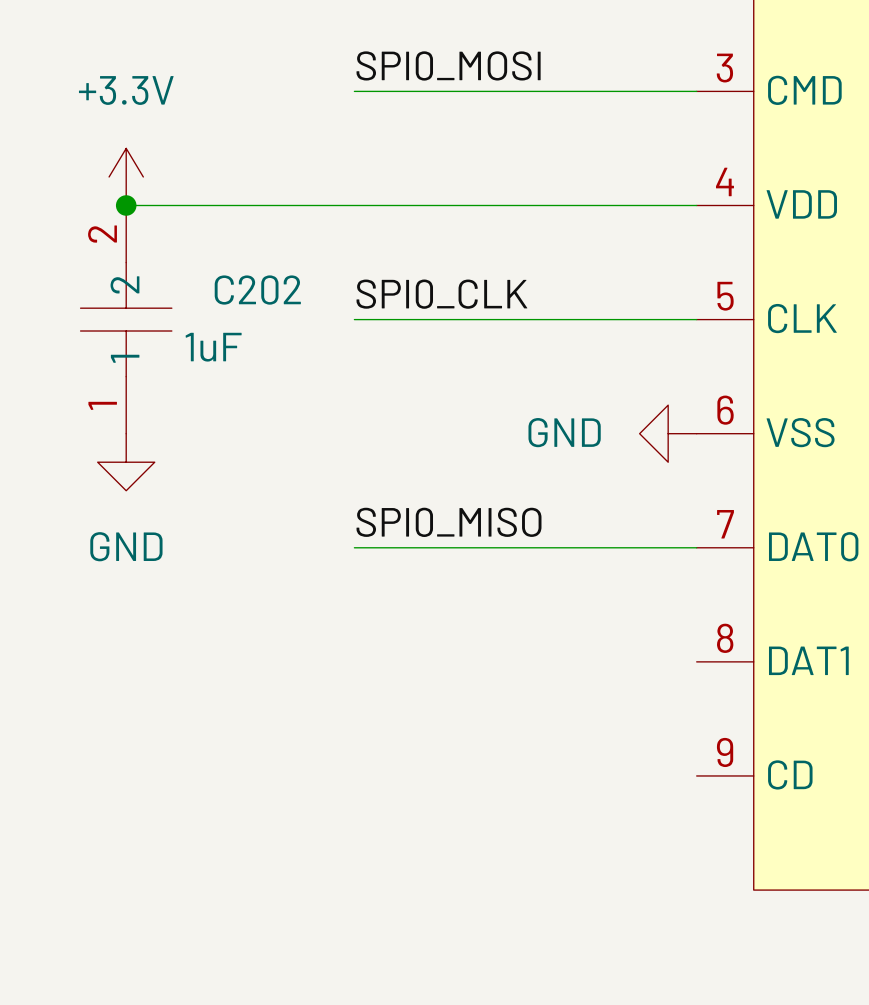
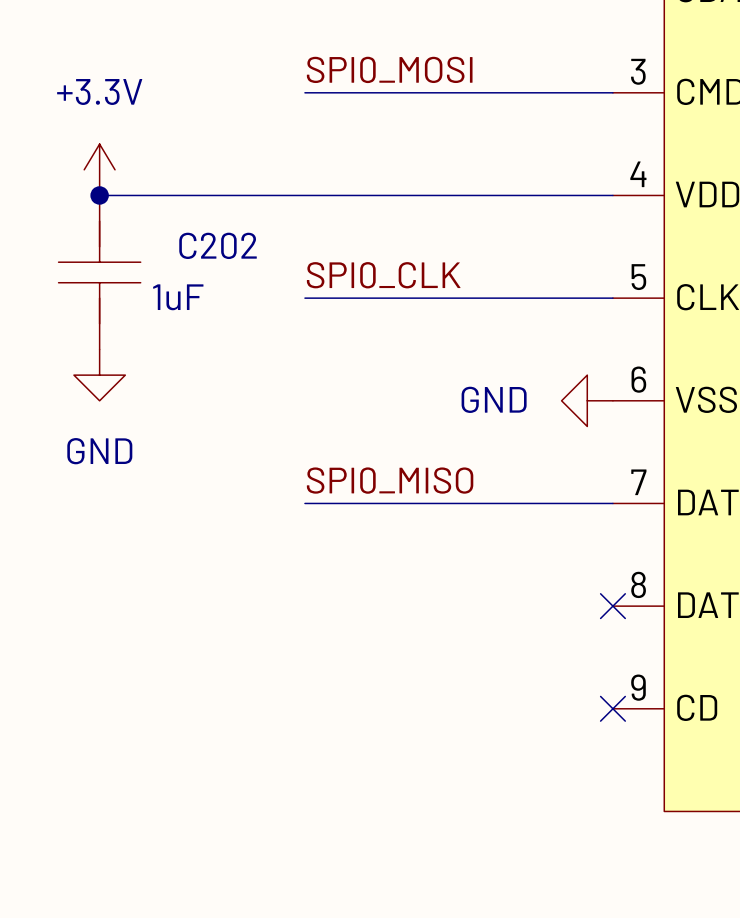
C202 symbol: [80, 205, 172, 434] -> [58, 195, 141, 350]
power symbol position: GND (126, 462) -> GND (99, 375)
no-connect mark: none -> (612, 606)
no-connect mark: none -> (612, 708)

